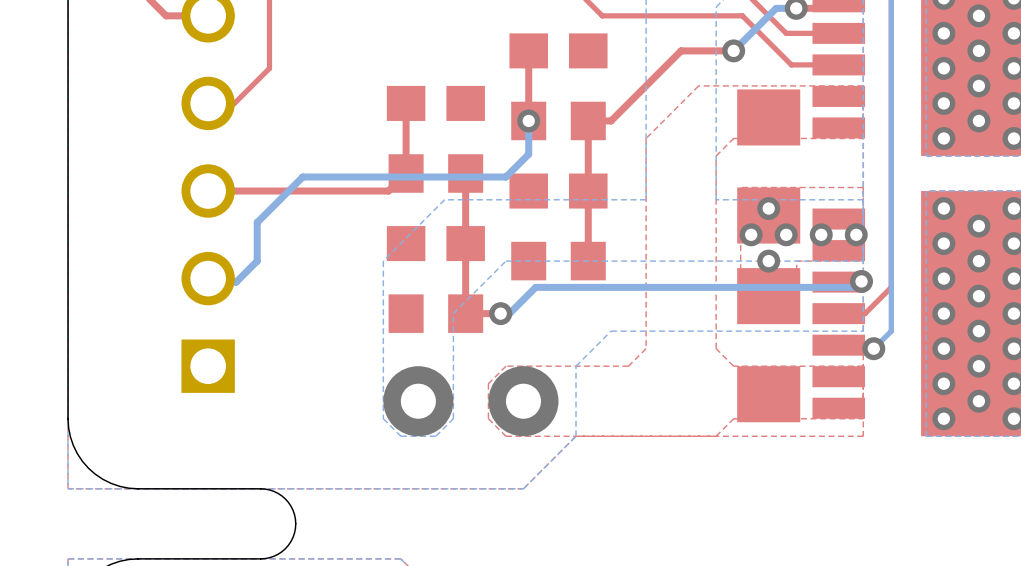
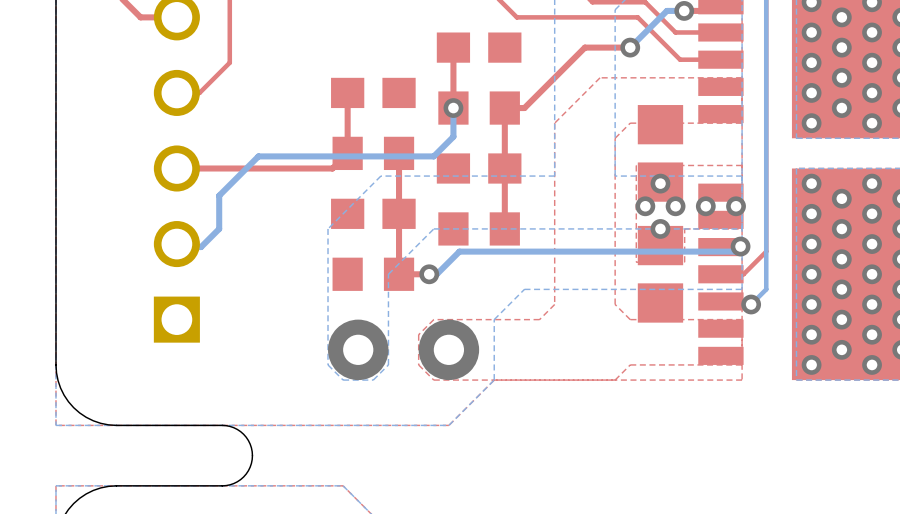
part footprint: [737, 89, 801, 244] -> [637, 105, 684, 202]
part footprint: [737, 268, 801, 423] -> [637, 225, 684, 323]

